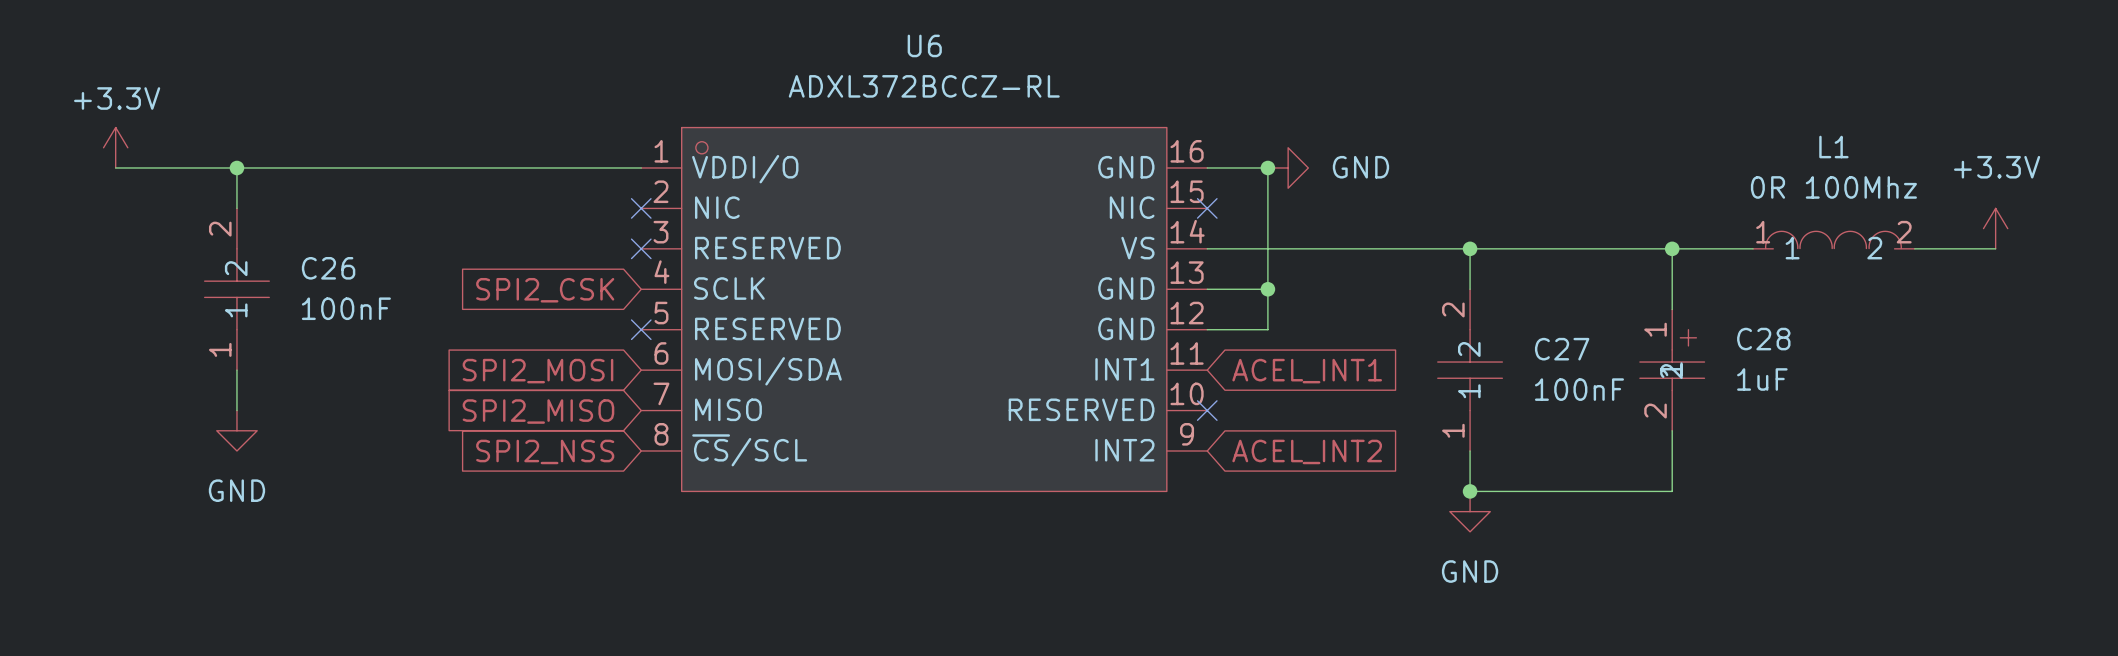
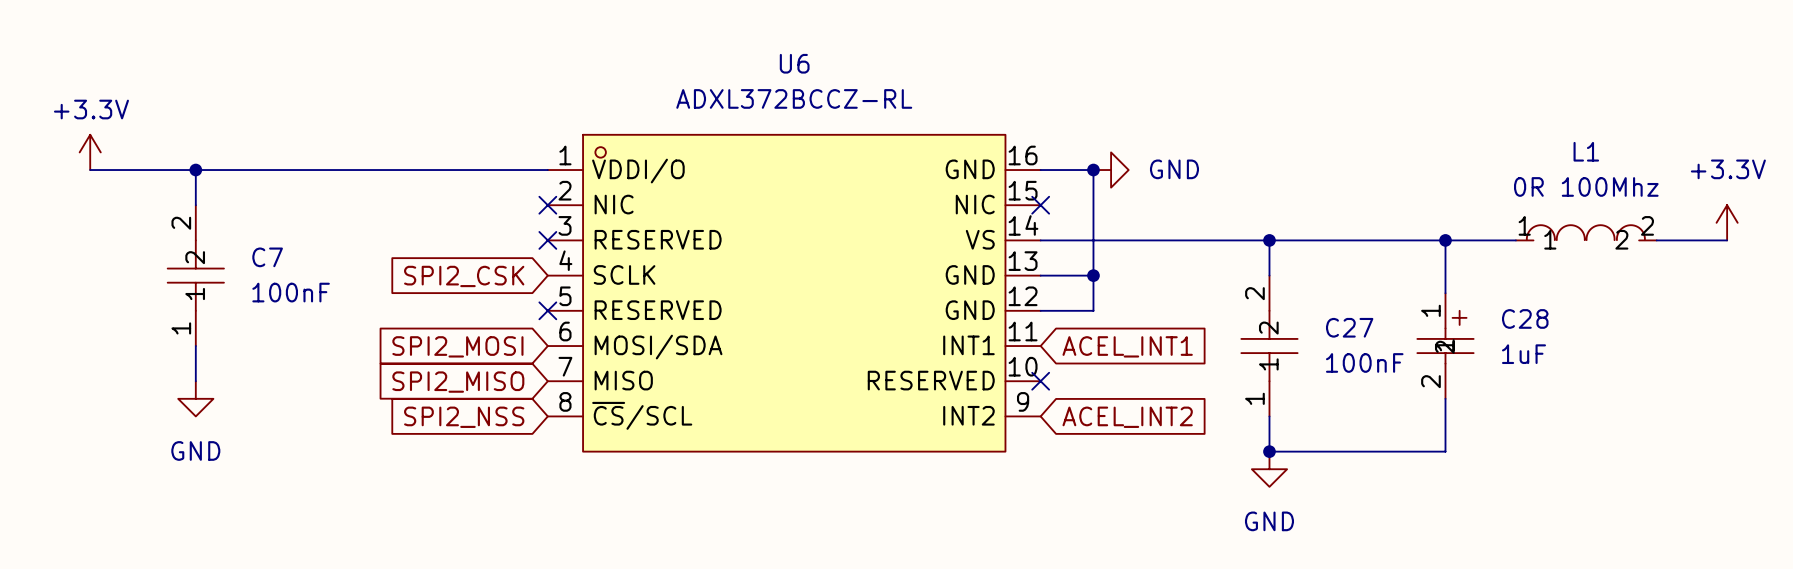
C26 name: C26 (328, 268) -> C7 (267, 257)

